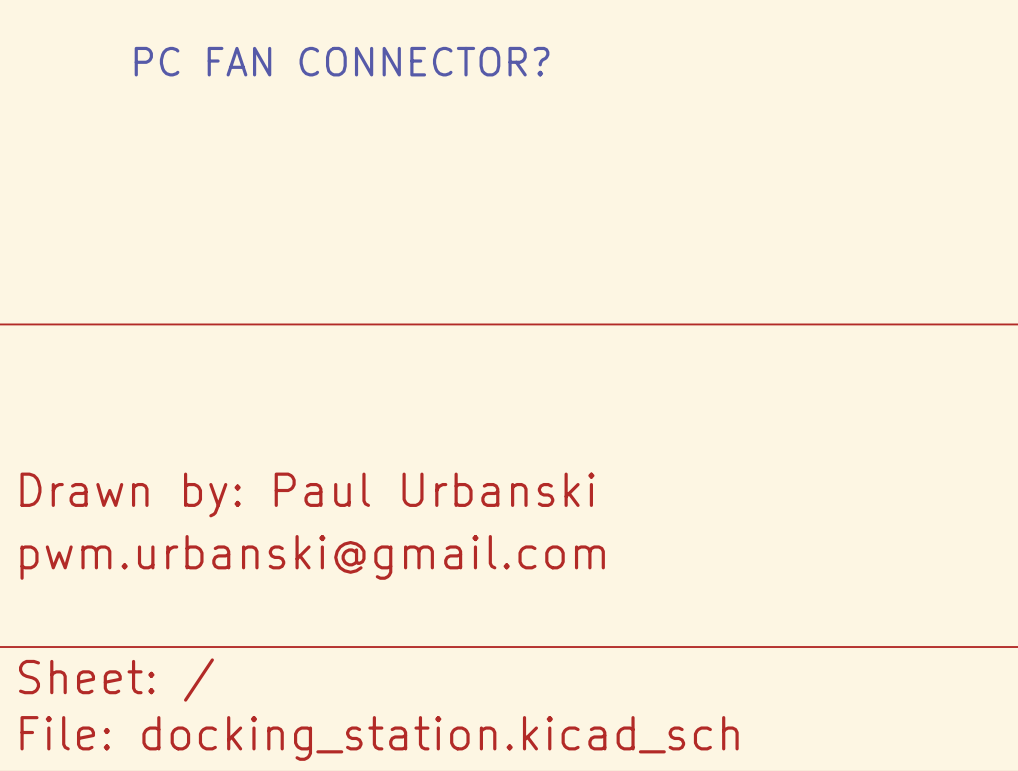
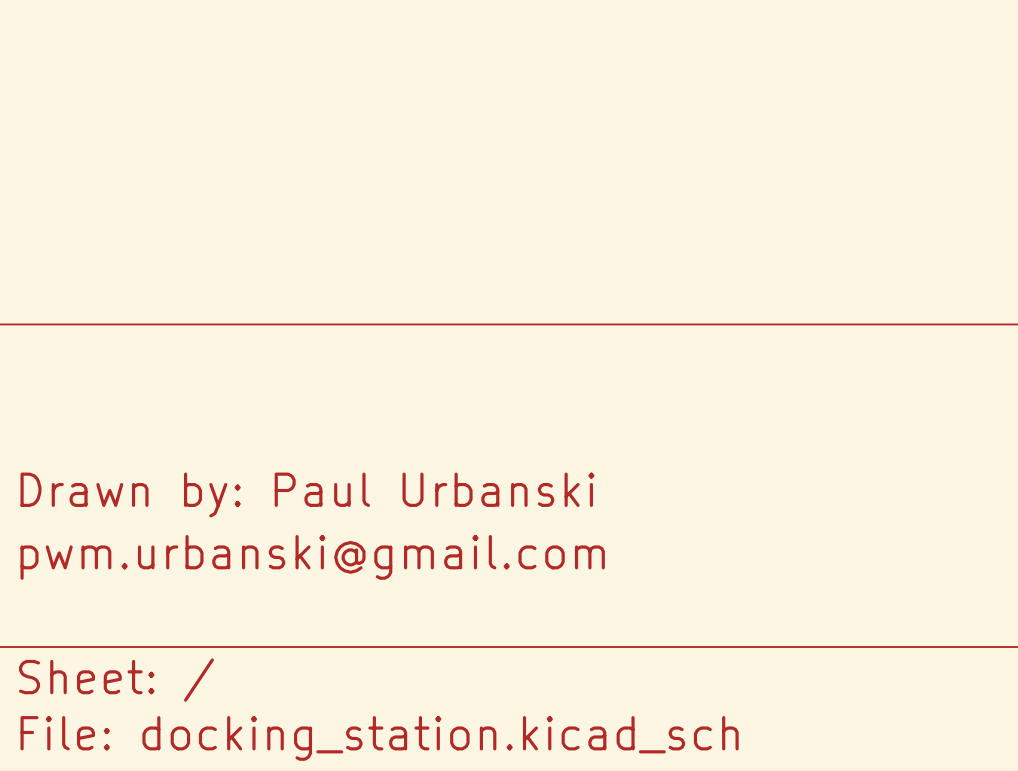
text: PC FAN CONNECTOR? (342, 61) -> none

